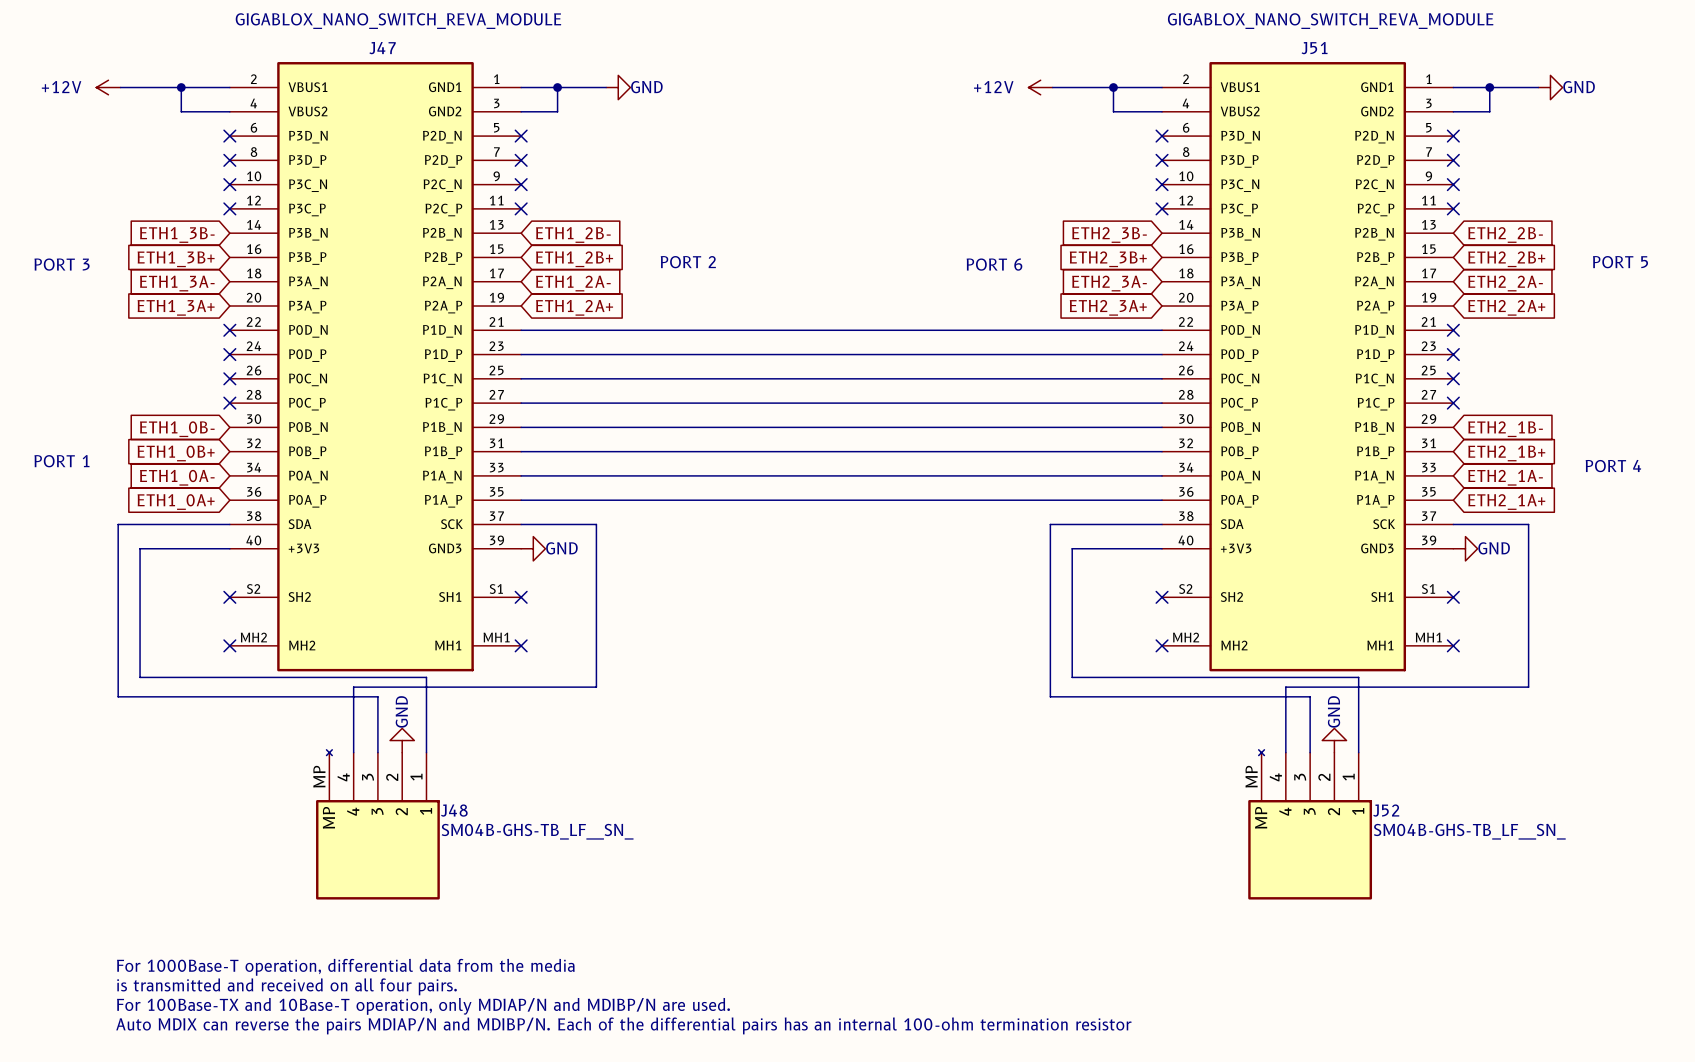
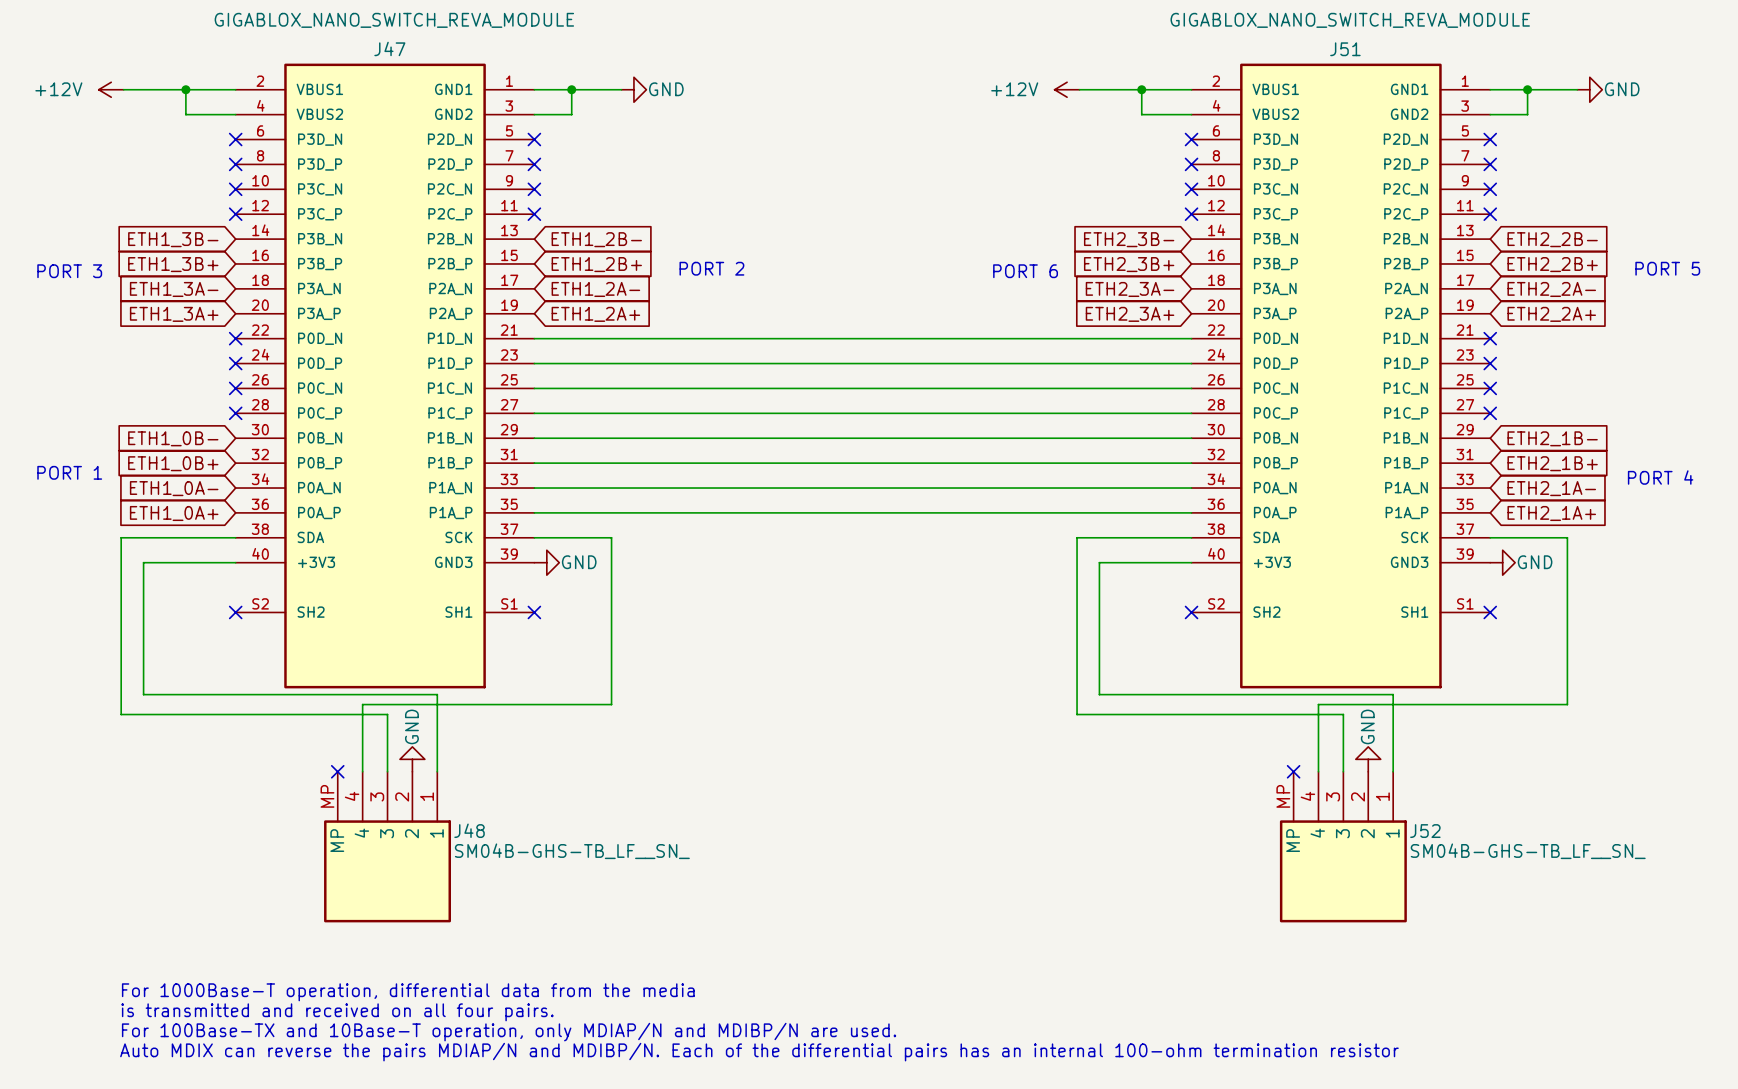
J47 symbol: [229, 62, 522, 672] -> [235, 63, 535, 689]
J51 symbol: [1162, 62, 1454, 672] -> [1191, 63, 1491, 689]
no-connect mark: (229, 645) -> none
no-connect mark: (521, 645) -> none
no-connect mark: (1162, 645) -> none
no-connect mark: (1453, 645) -> none
J48 symbol: [316, 749, 440, 900] -> [324, 771, 452, 923]
J52 symbol: [1248, 749, 1373, 900] -> [1279, 771, 1407, 923]
no-connect mark: none -> (337, 771)
no-connect mark: none -> (1293, 771)

